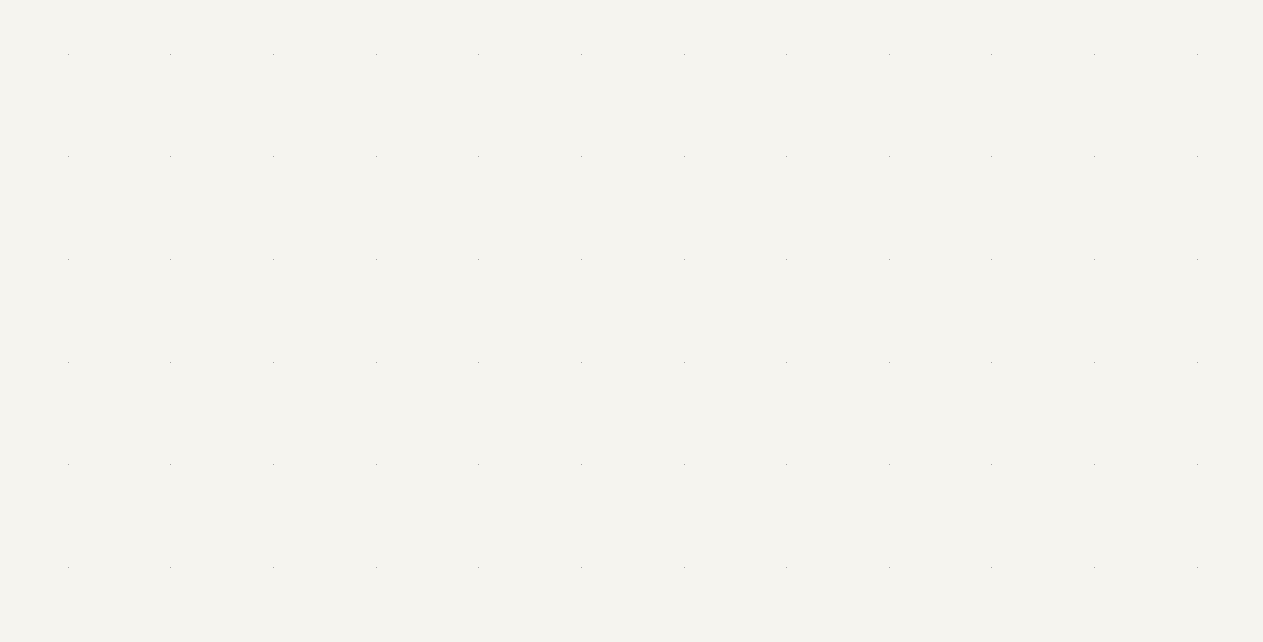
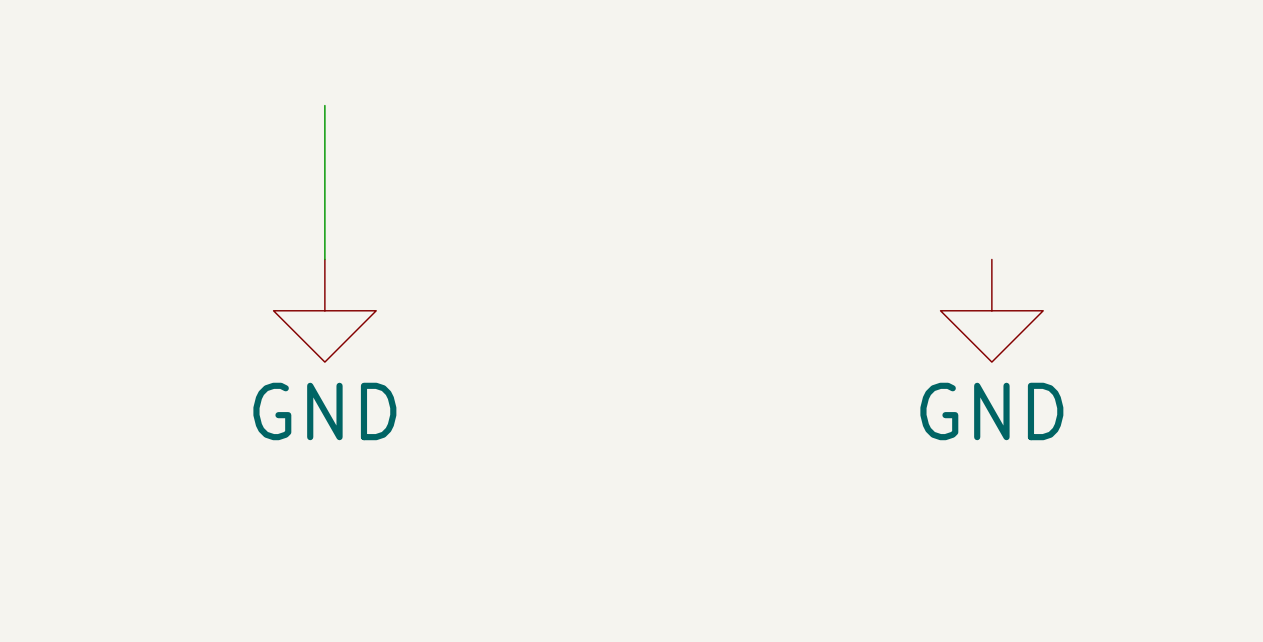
wire: none -> (324, 105) (324, 259)
power symbol: none -> GND (324, 310)
power symbol: none -> GND (991, 310)

